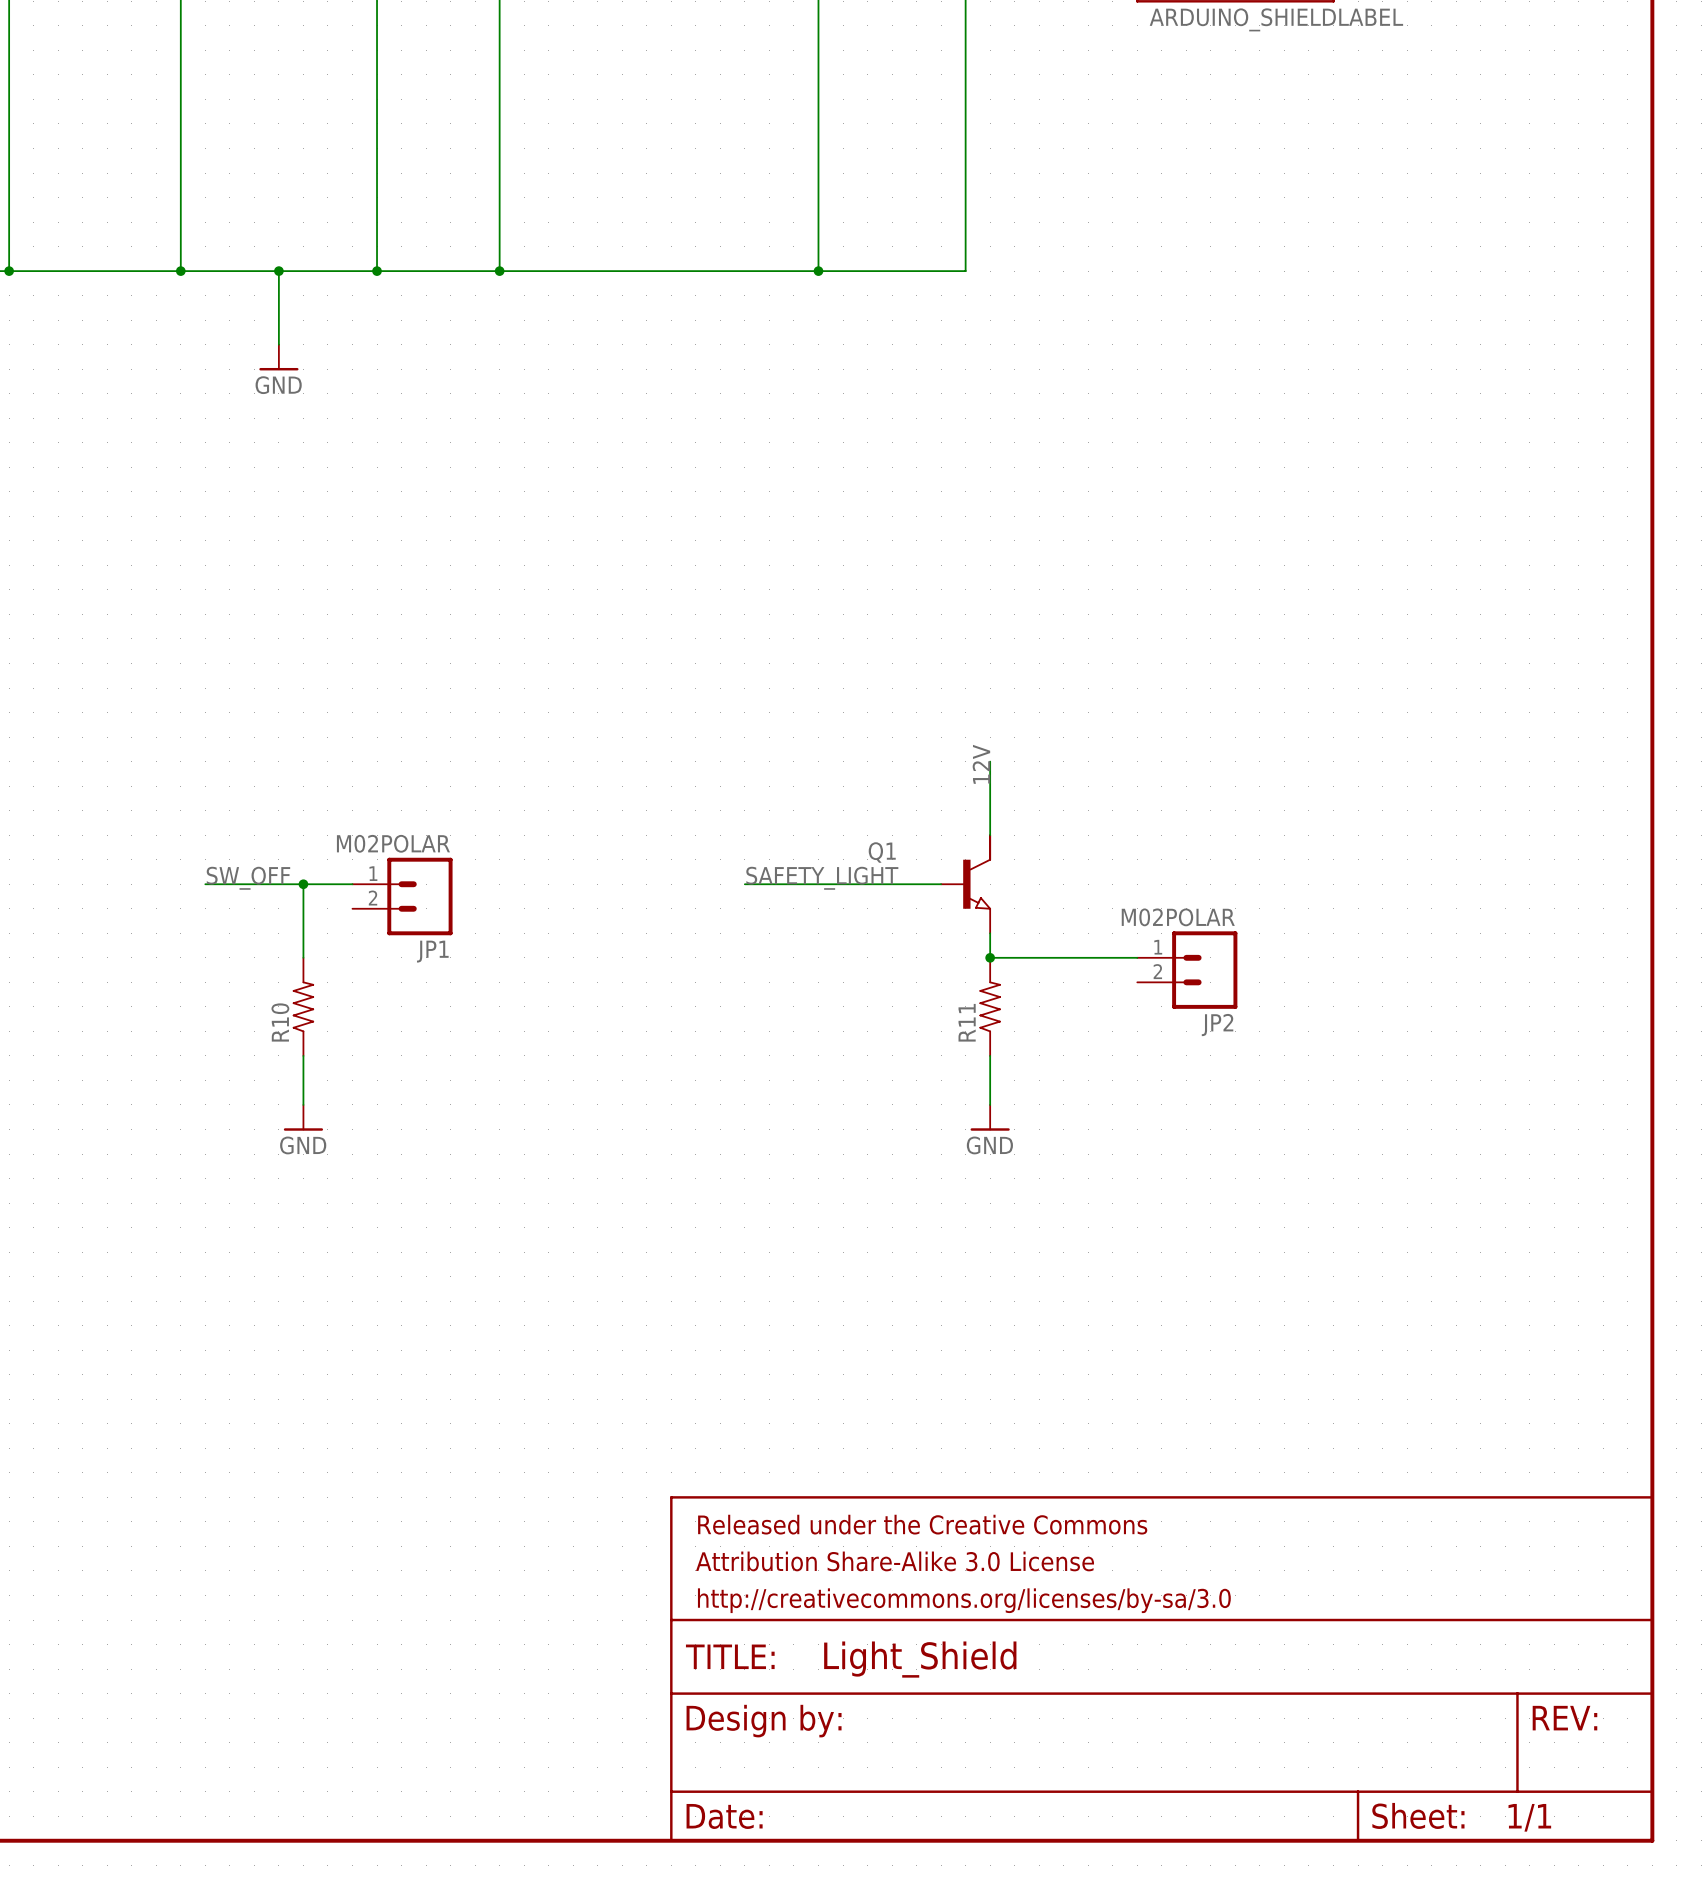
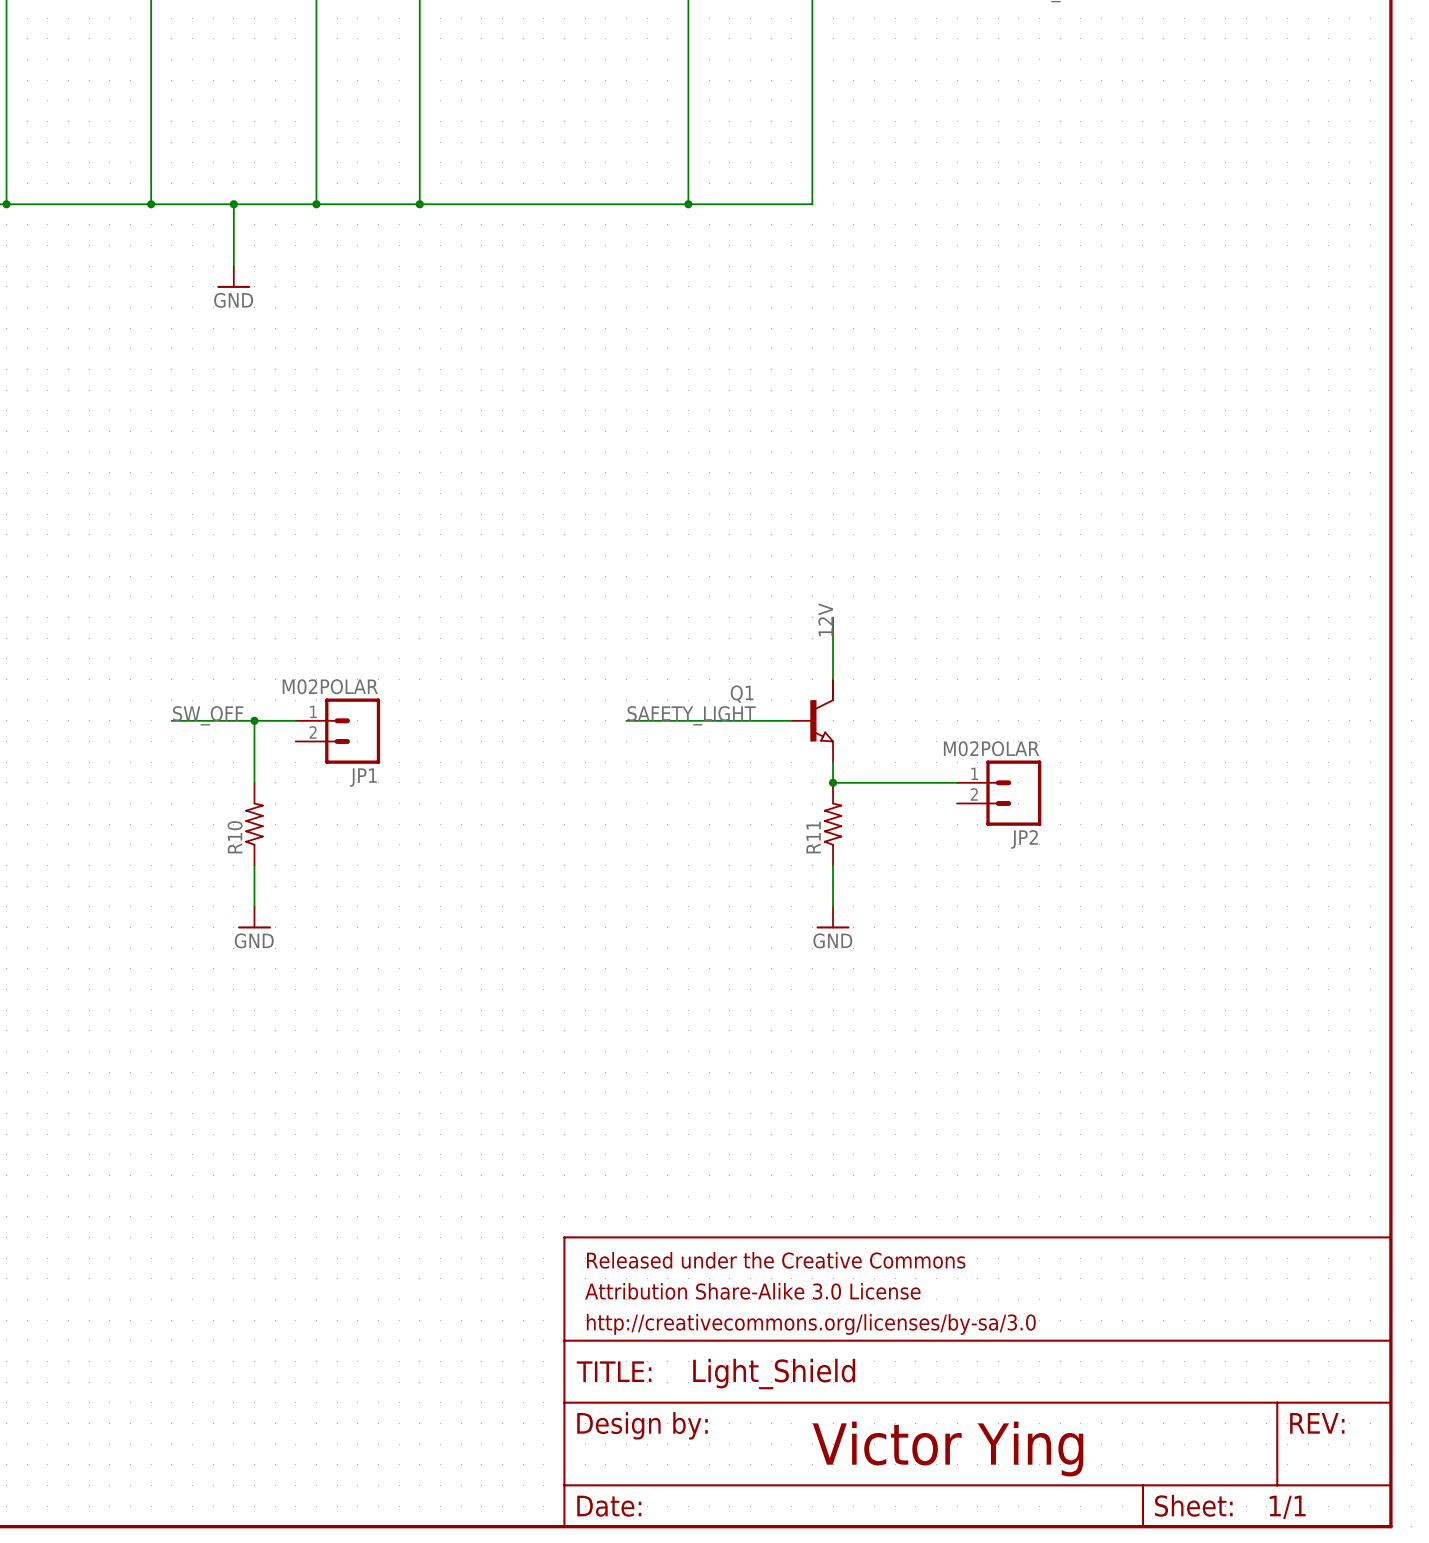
text: none -> Victor Ying (948, 1449)

